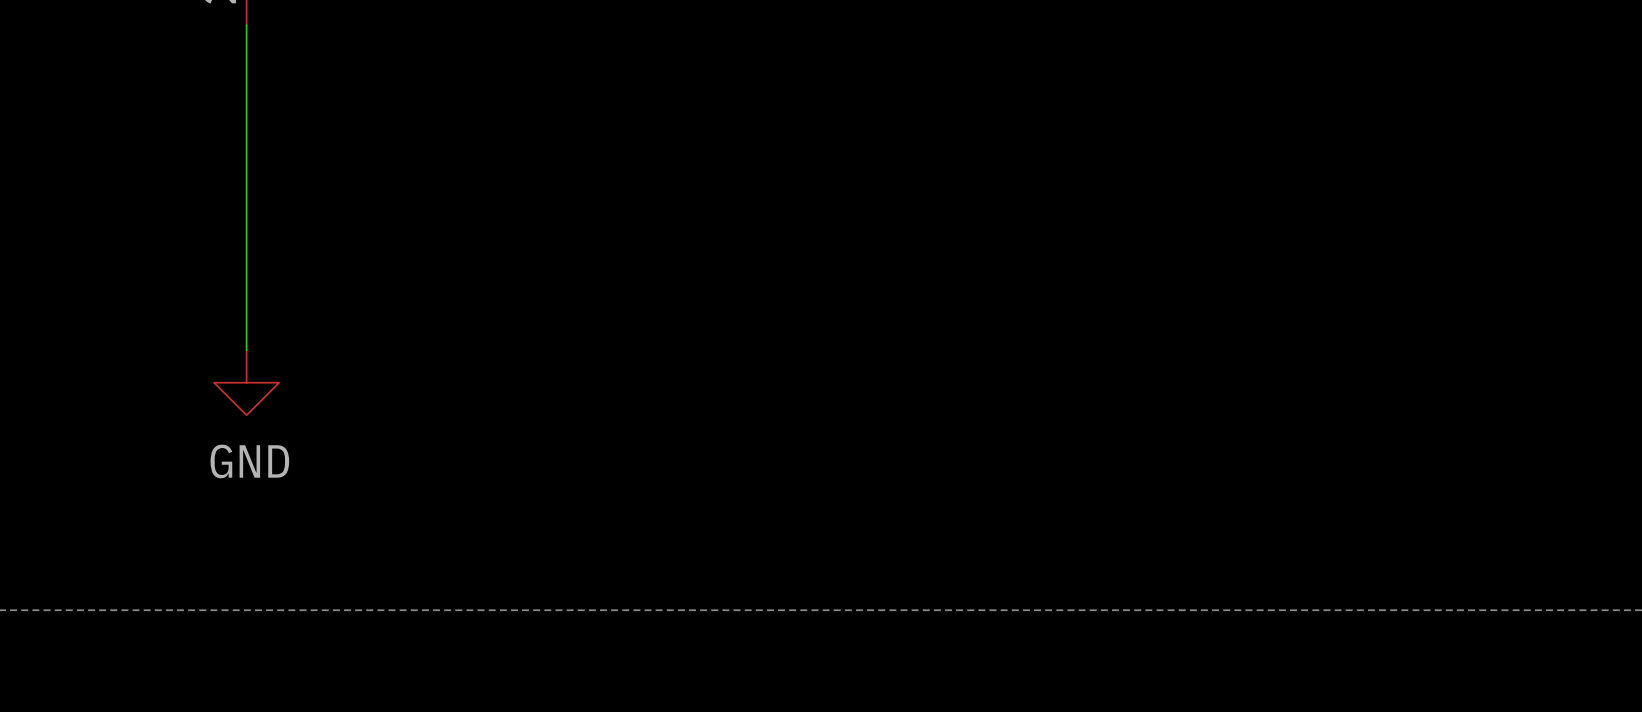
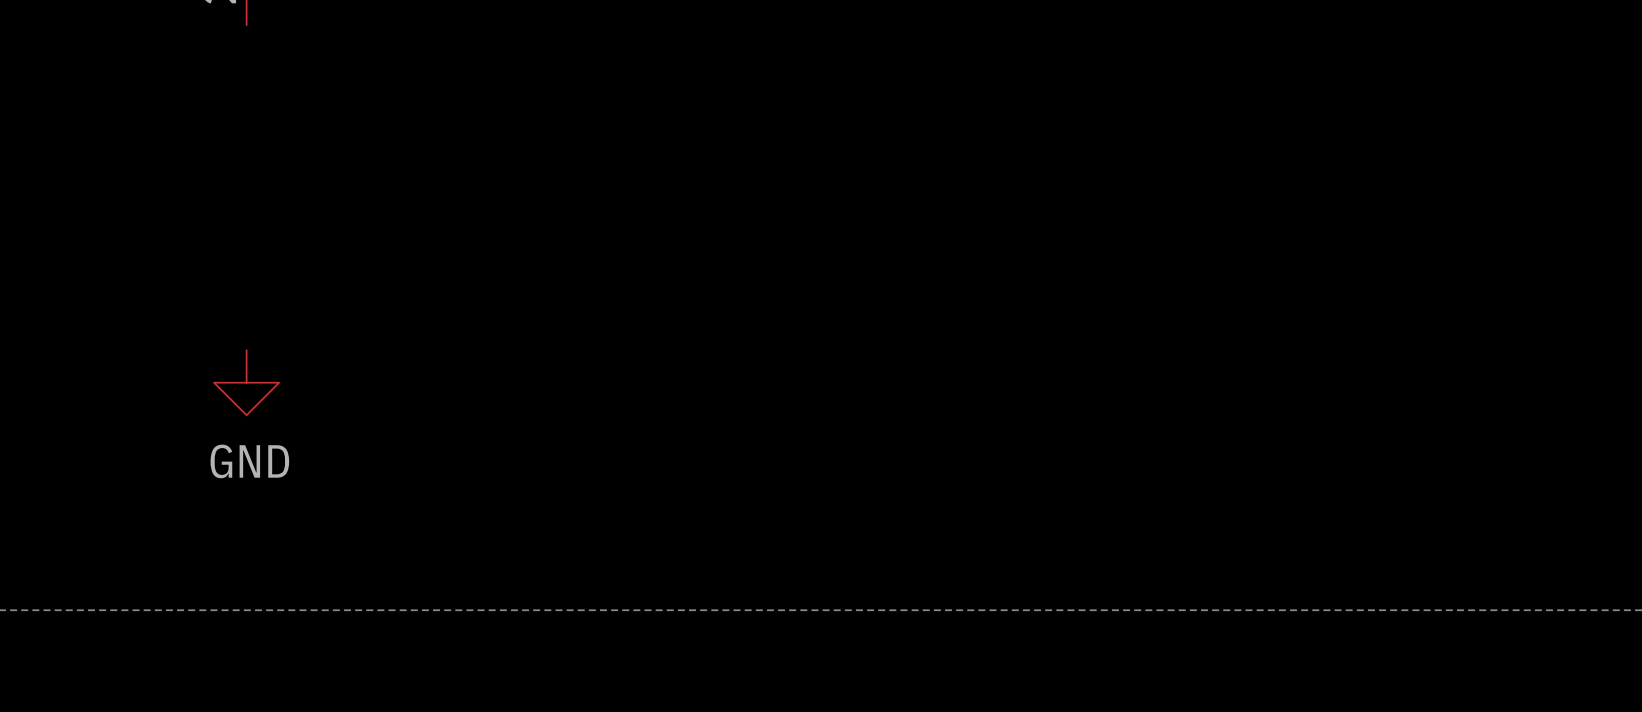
wire: (246, 25) (246, 350) -> none

